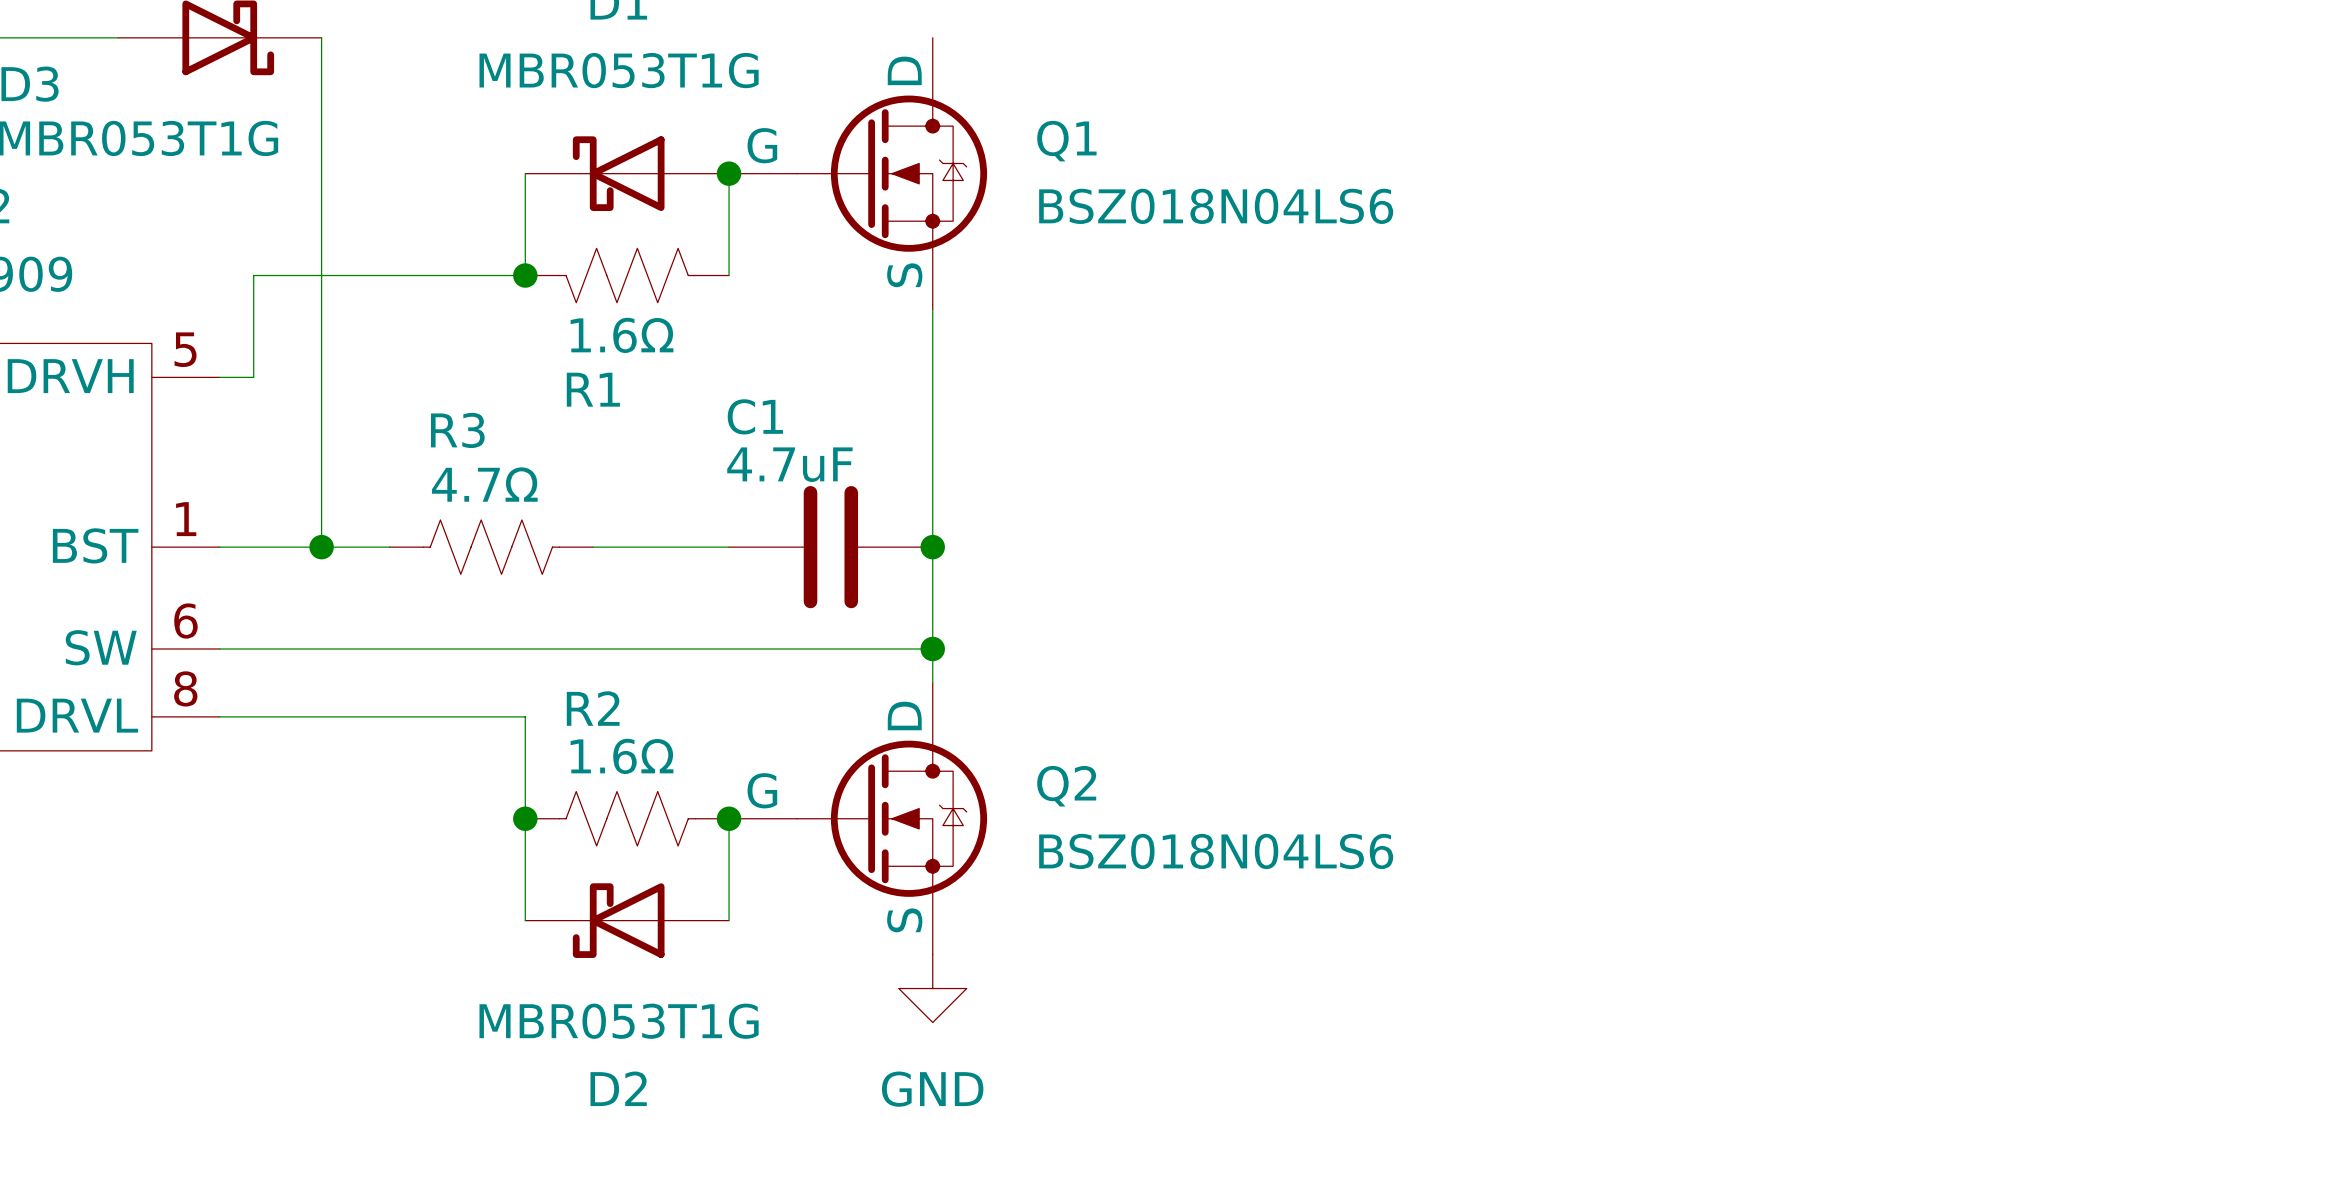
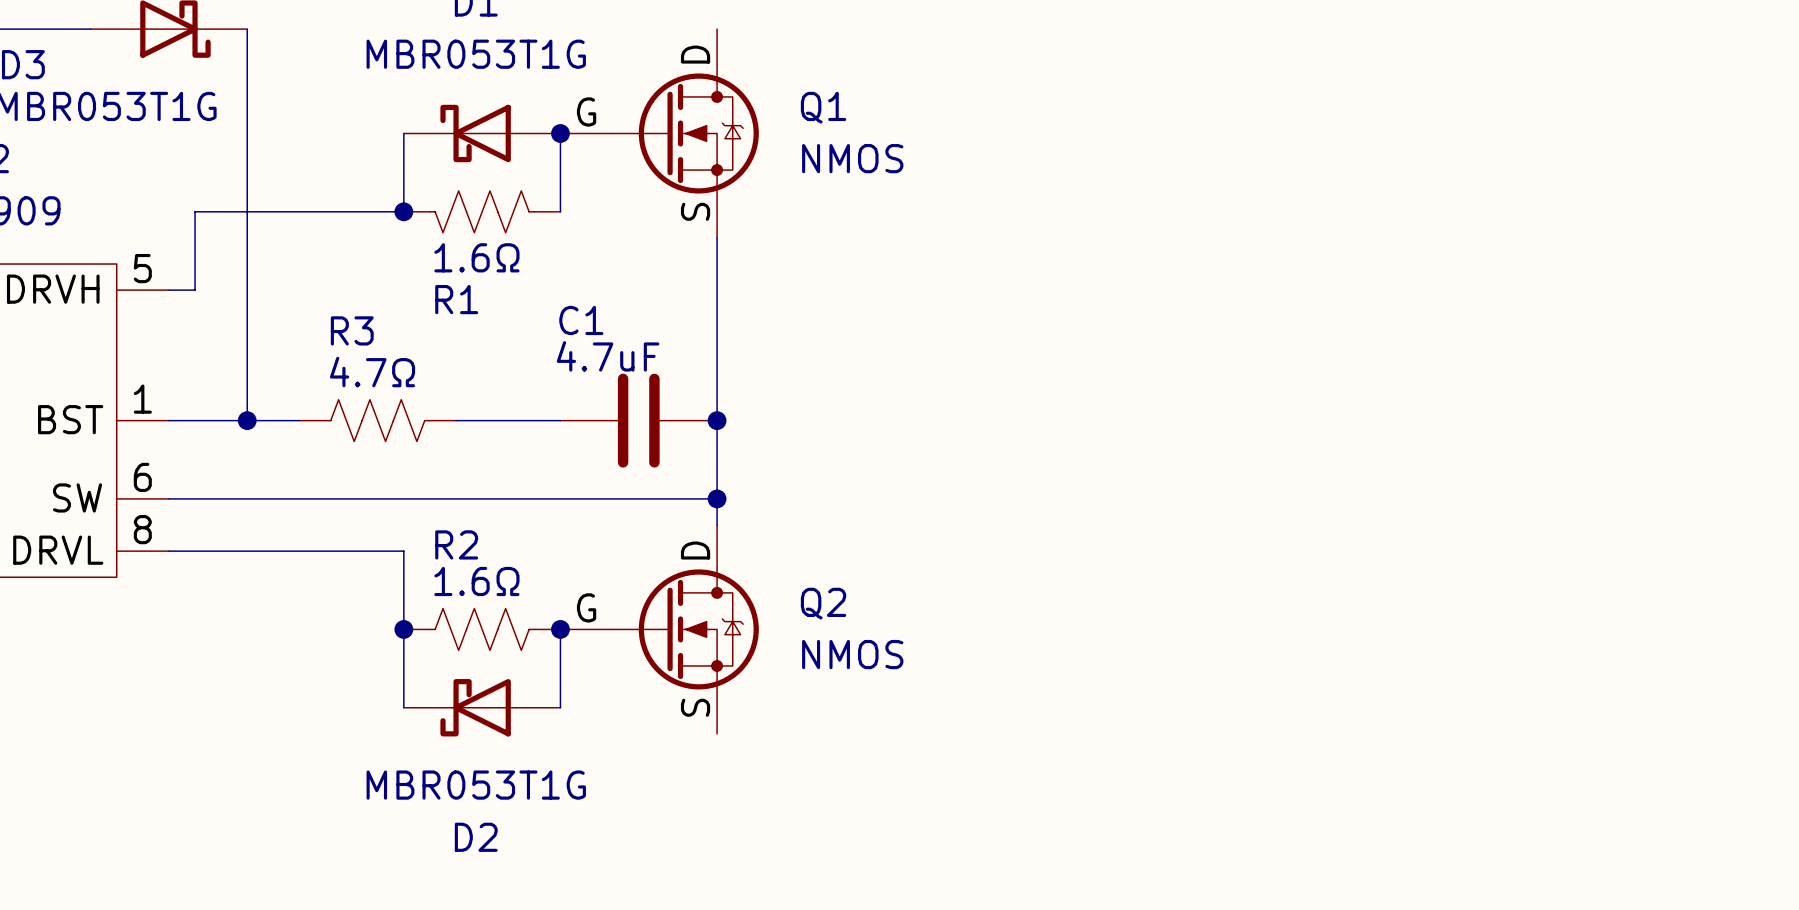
Q1 value: BSZ018N04LS6 (1216, 206) -> NMOS (852, 158)
Q2 value: BSZ018N04LS6 (1216, 851) -> NMOS (852, 654)
power symbol: GND (932, 988) -> none

